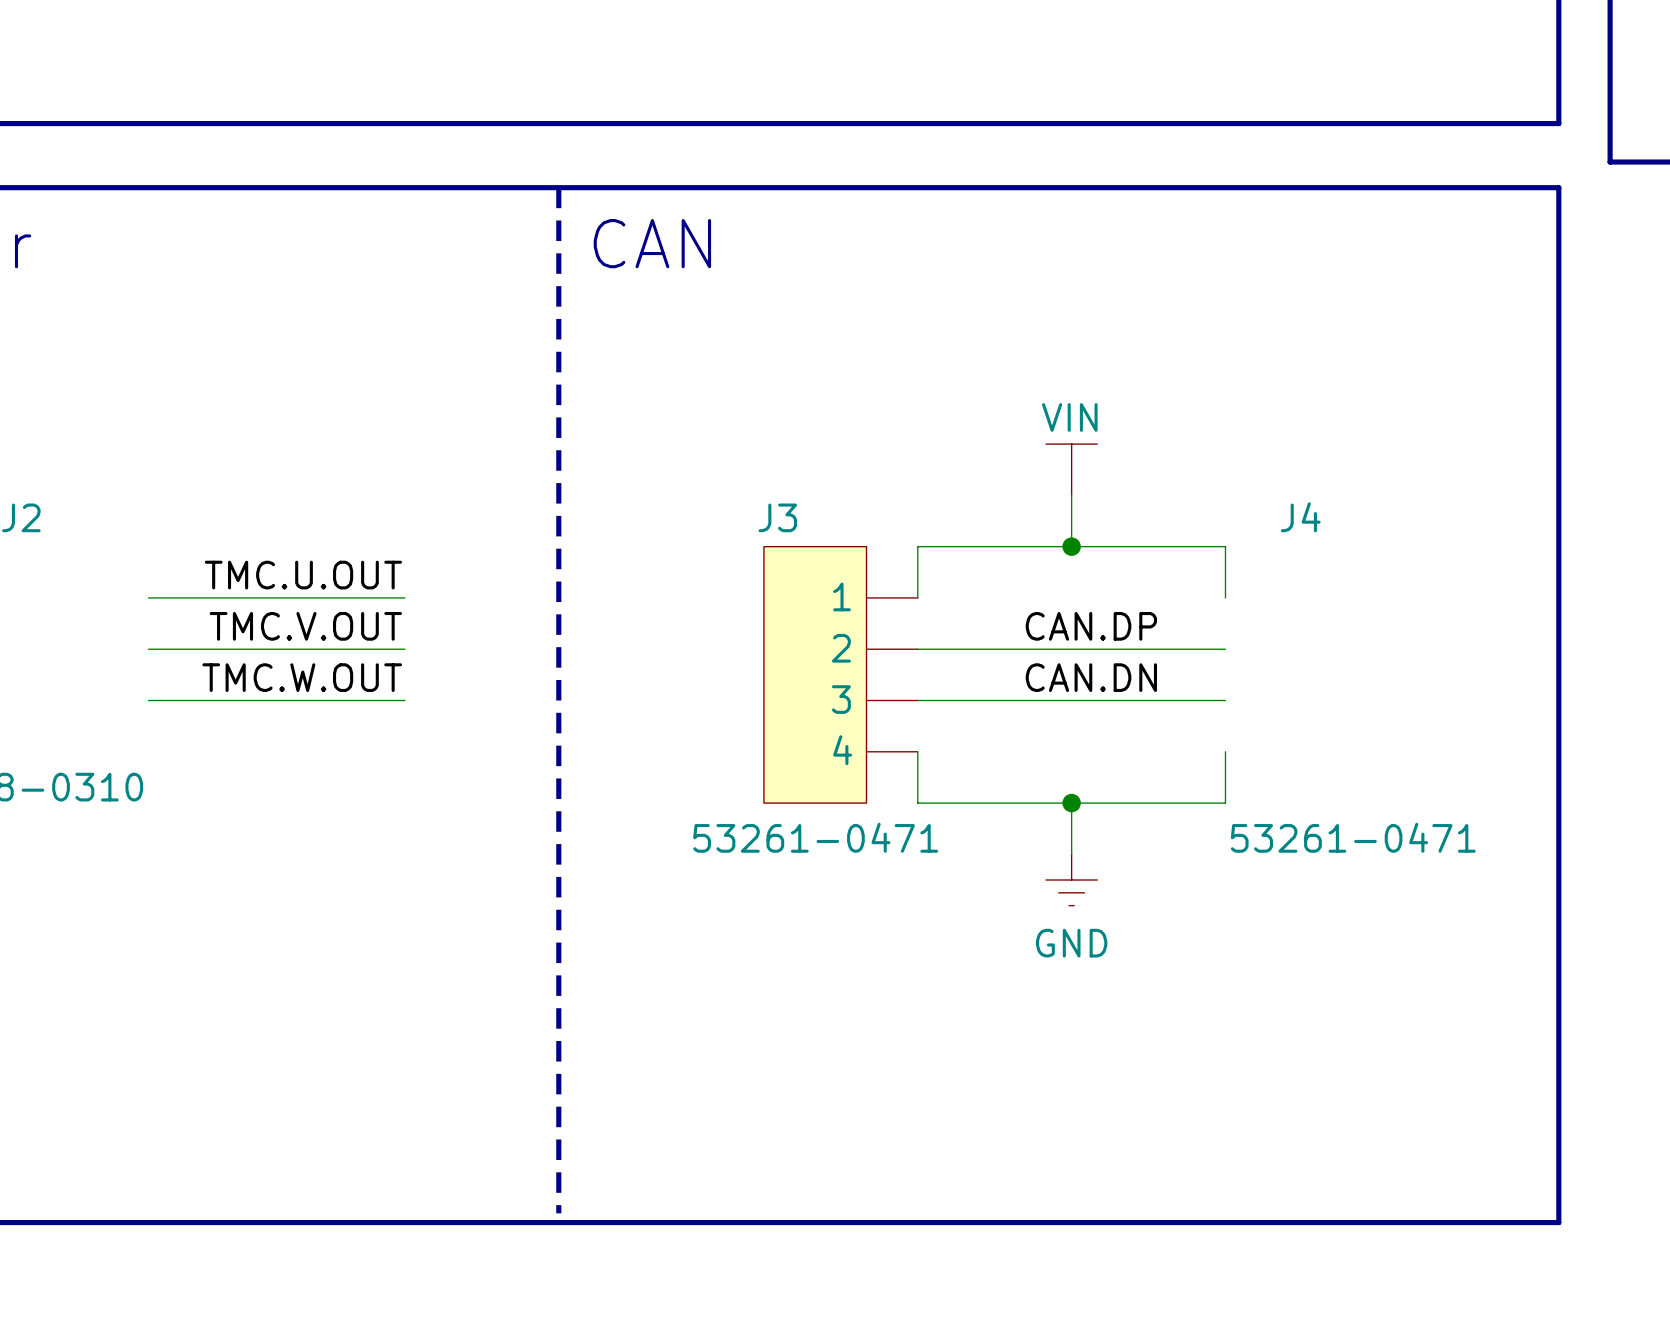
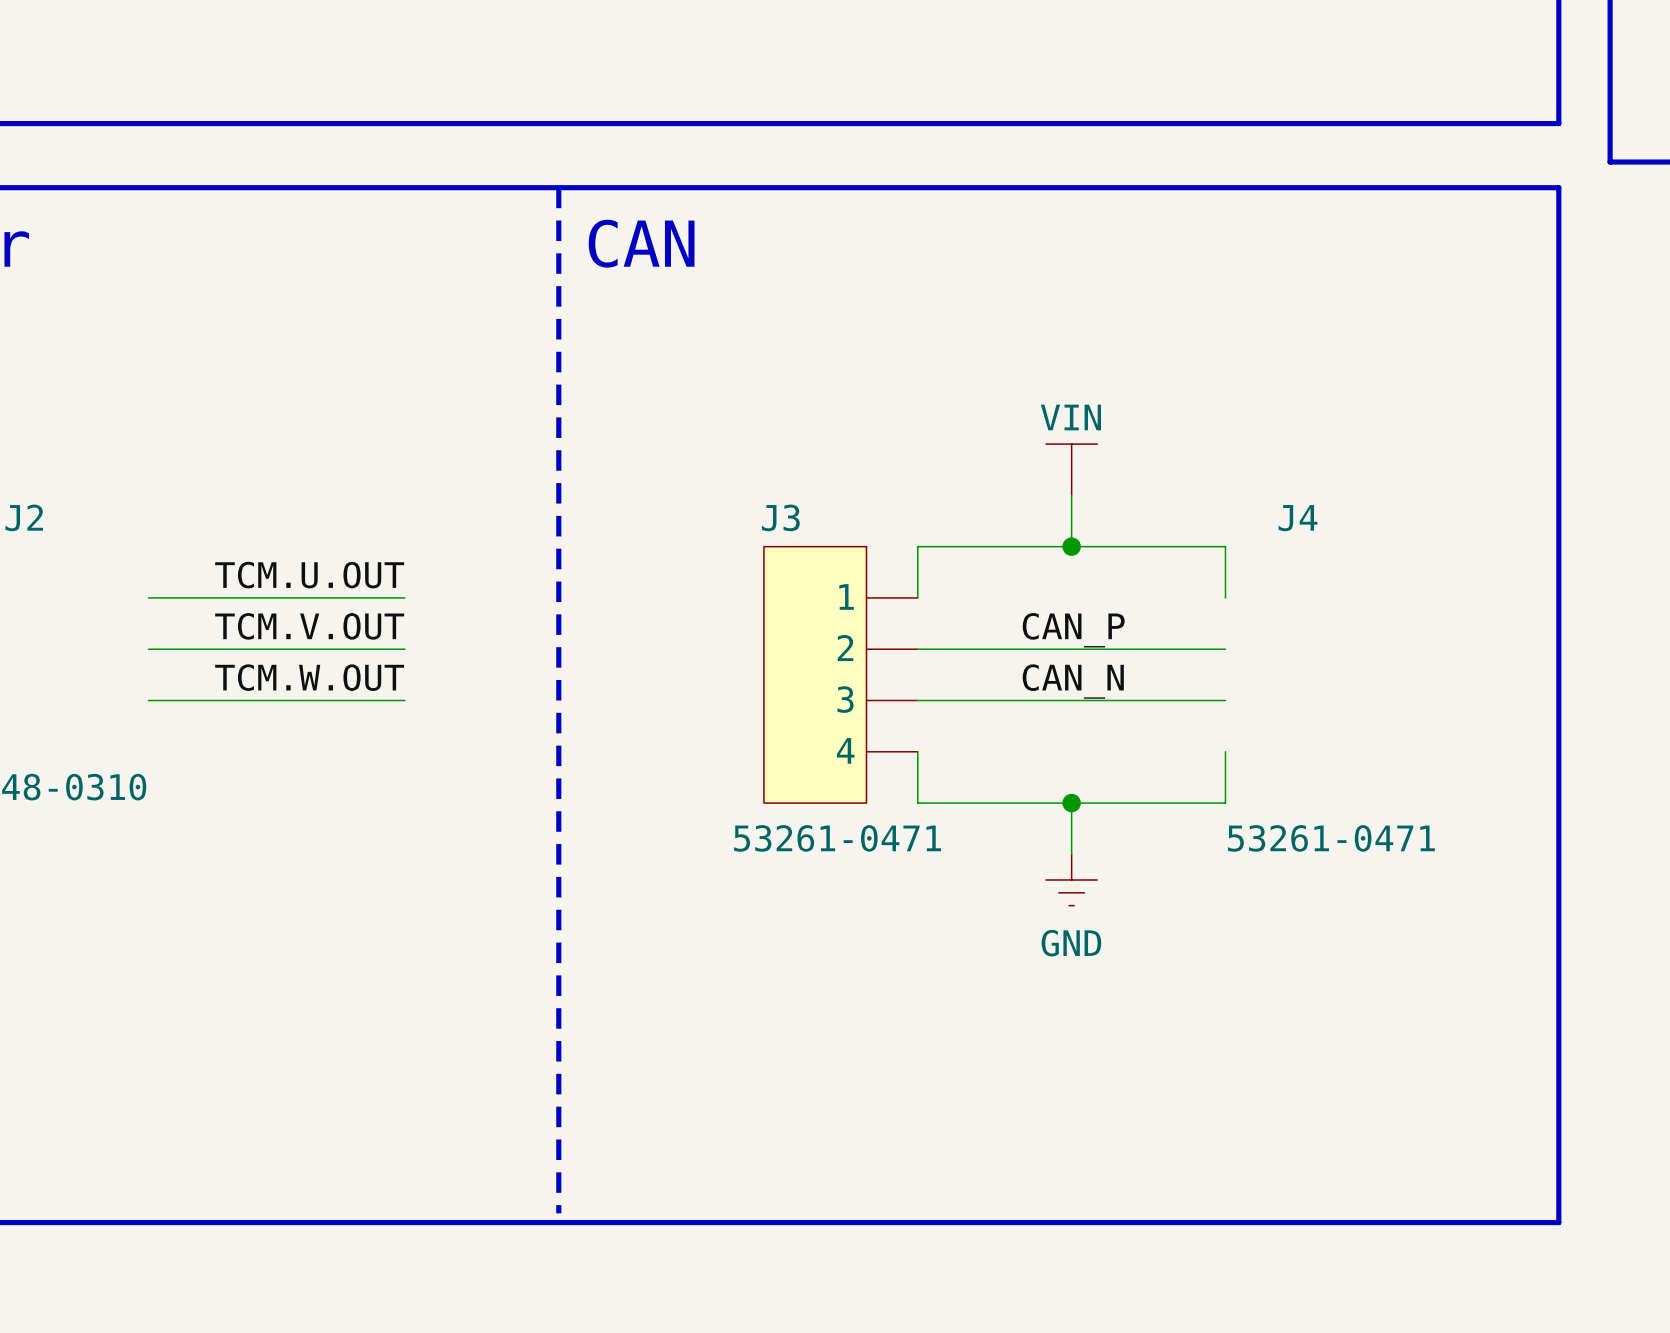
label: TMC.U.OUT (303, 575) -> TCM.U.OUT (309, 575)
label: TMC.V.OUT (305, 626) -> TCM.V.OUT (309, 626)
label: CAN.DP (1091, 626) -> CAN_P (1073, 630)
label: TMC.W.OUT (302, 677) -> TCM.W.OUT (309, 677)
label: CAN.DN (1091, 677) -> CAN_N (1073, 681)

